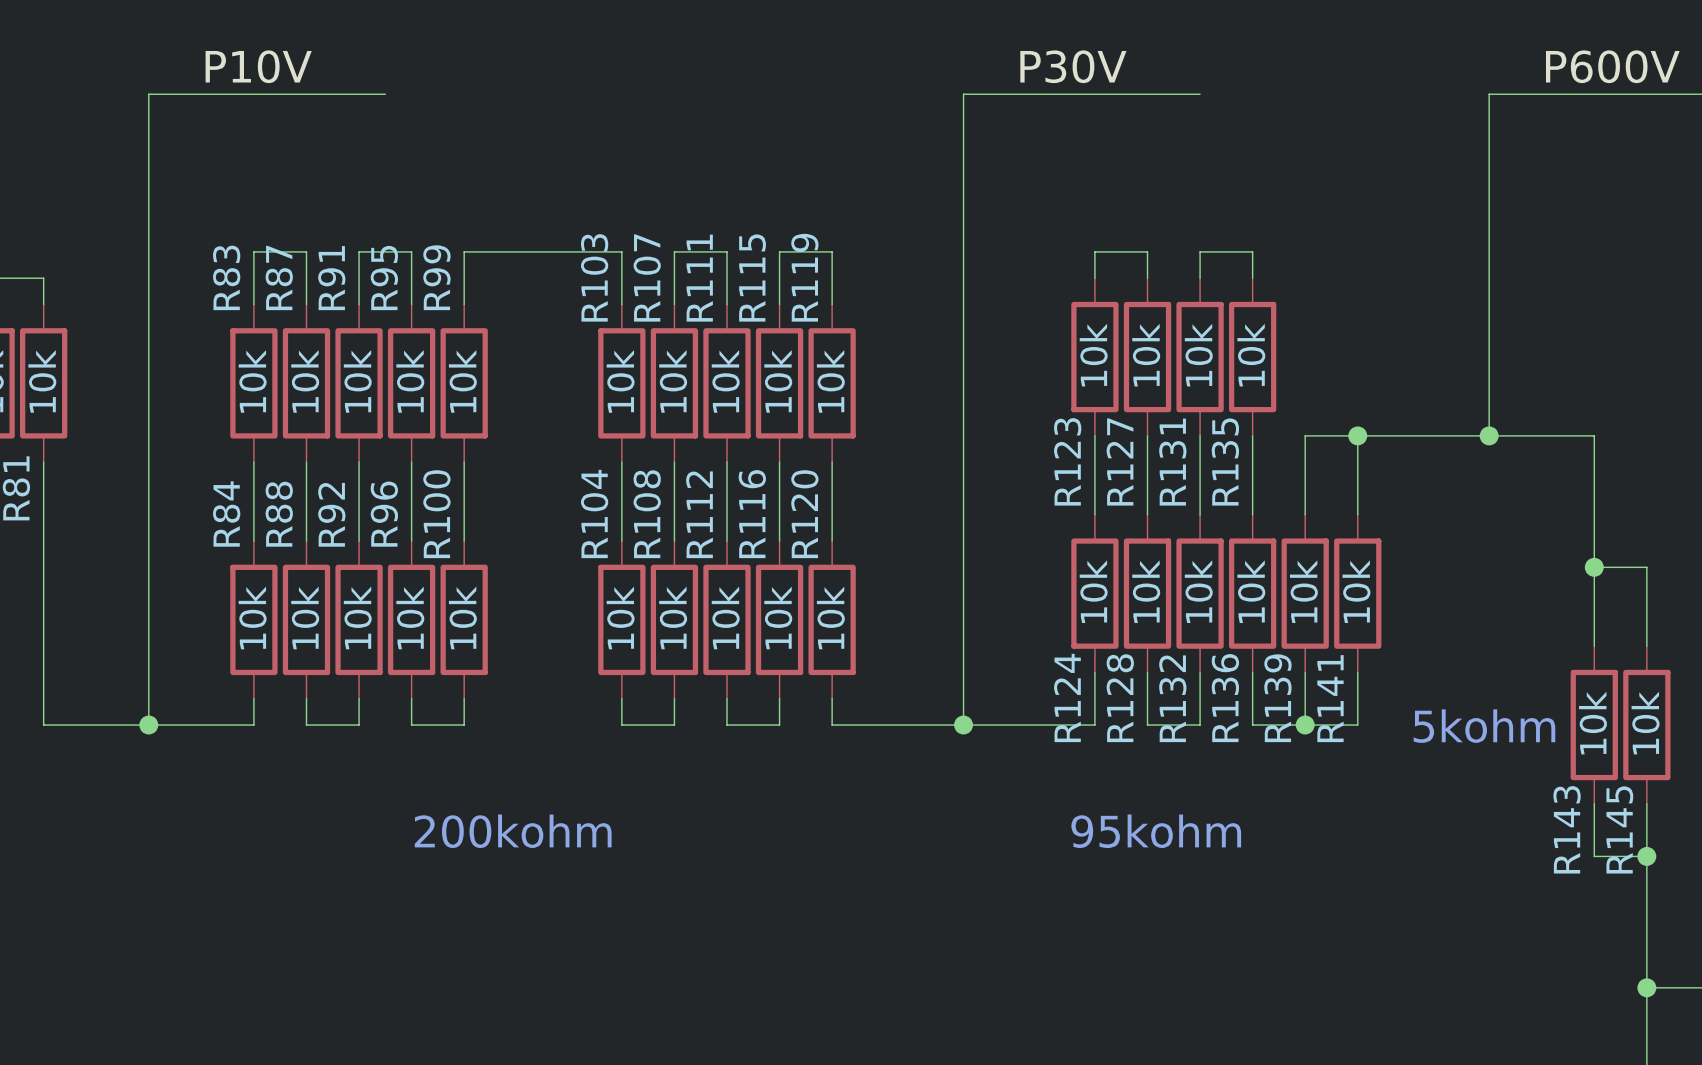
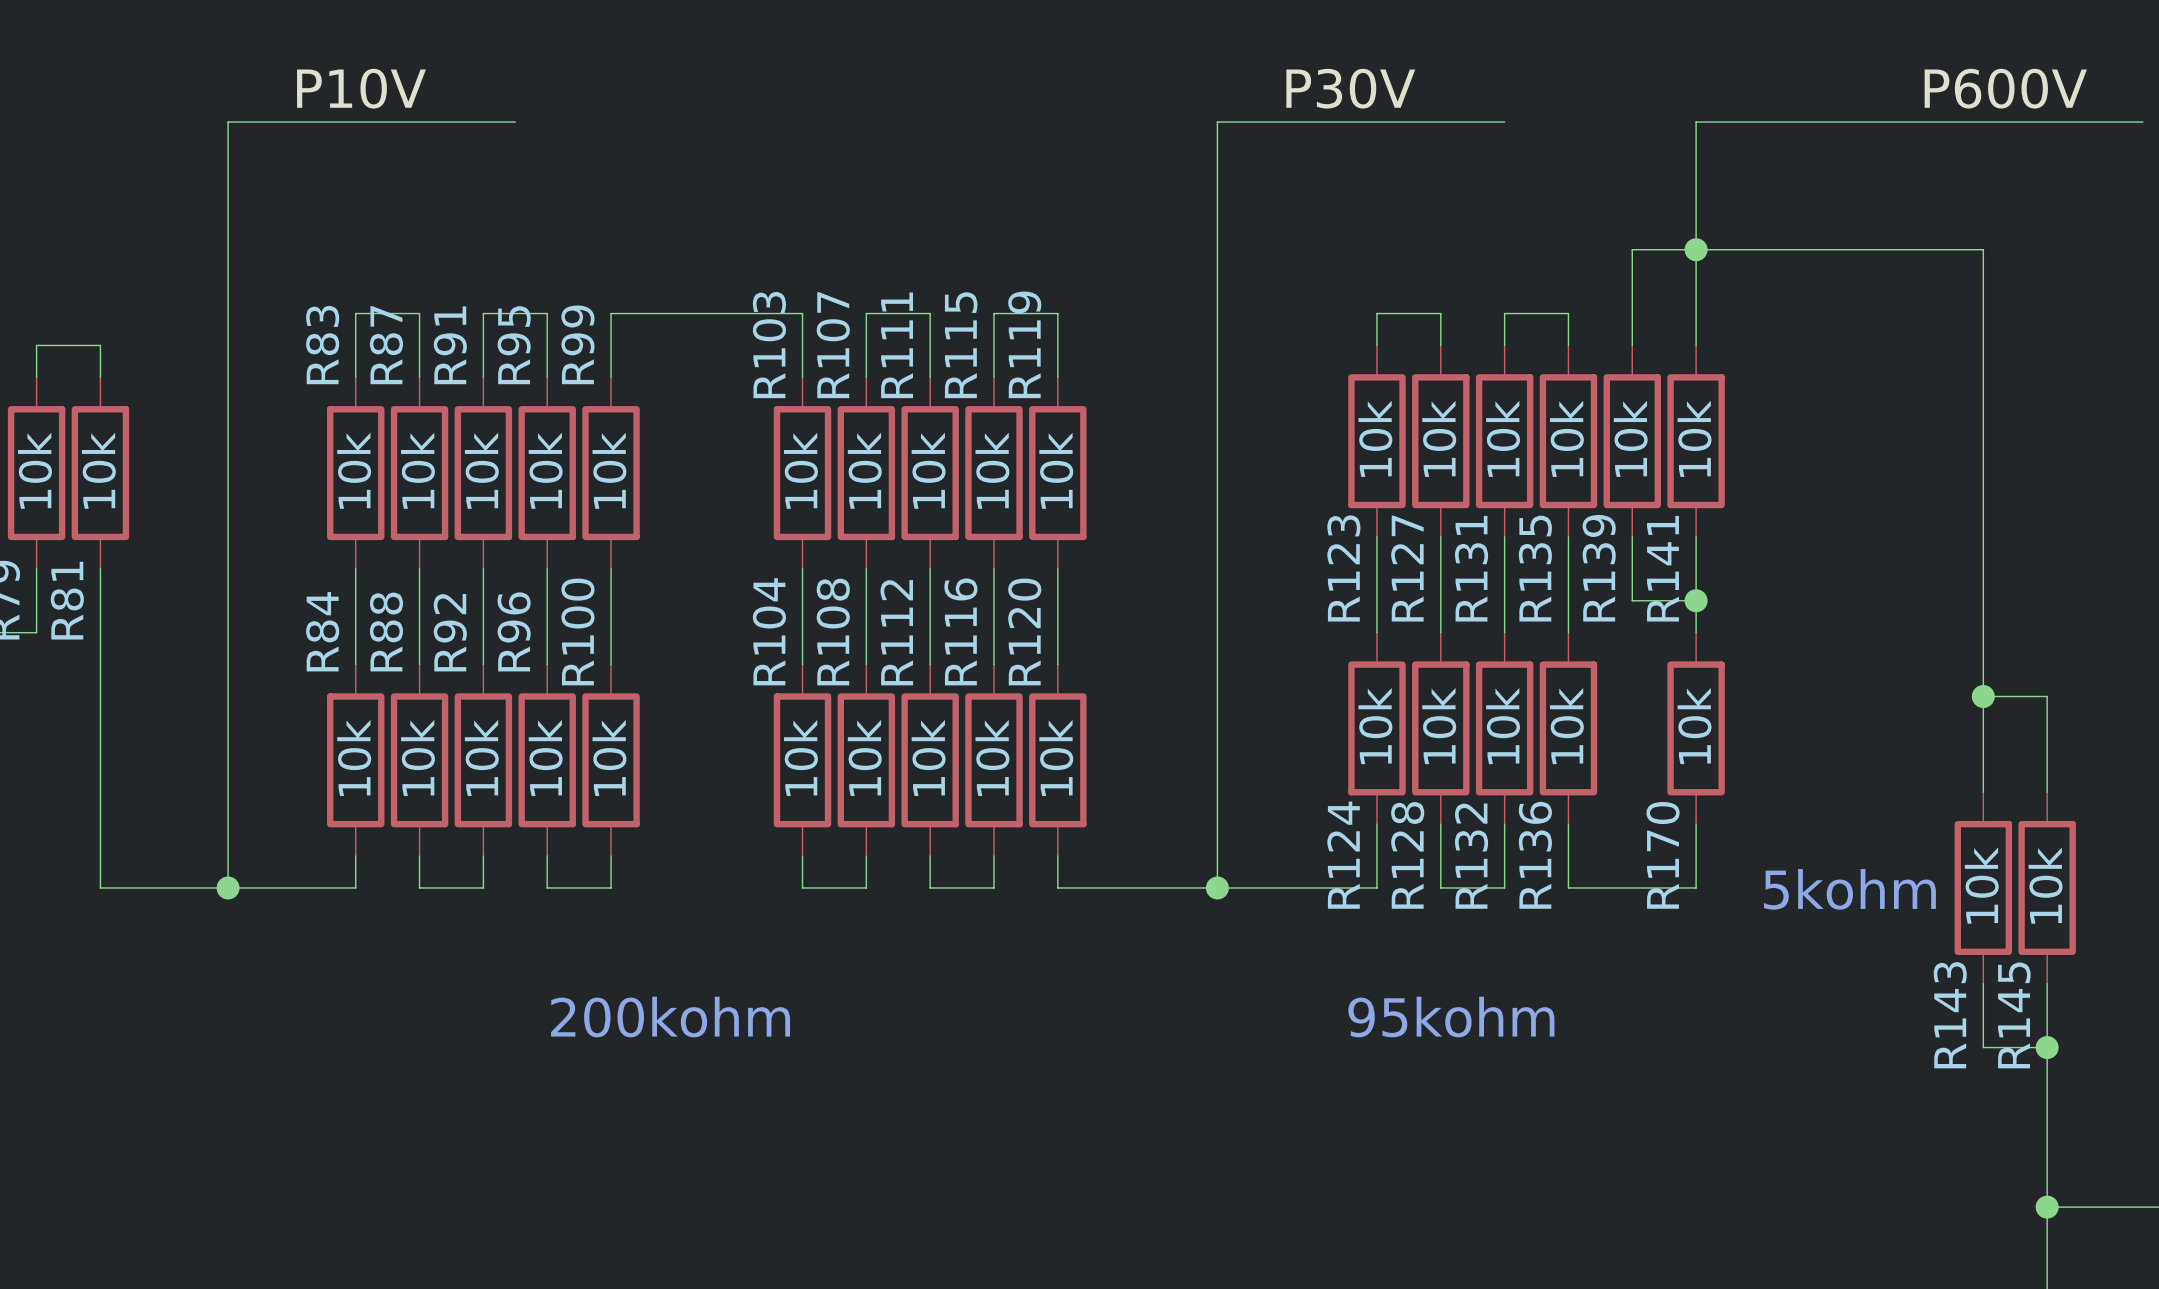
wire: (1489, 94) (1489, 435) -> (1855, 122) (1696, 122) (1696, 345)
junction: none -> (1696, 249)
R141: none -> 10k (1696, 441)
wire: (1305, 435) (1594, 435) -> (1632, 345) (1632, 249) (1983, 249) (1983, 536)
junction position: (1357, 435) -> (1696, 600)
junction: (1489, 435) -> none
wire: (1305, 488) (1305, 514) -> (1632, 600) (1696, 600)
R139 position: (1305, 593) -> (1632, 441)
wire: (1305, 672) (1305, 725) -> none
R141 name: R141 (1330, 698) -> R170 (1663, 855)
junction: (1305, 725) -> none

